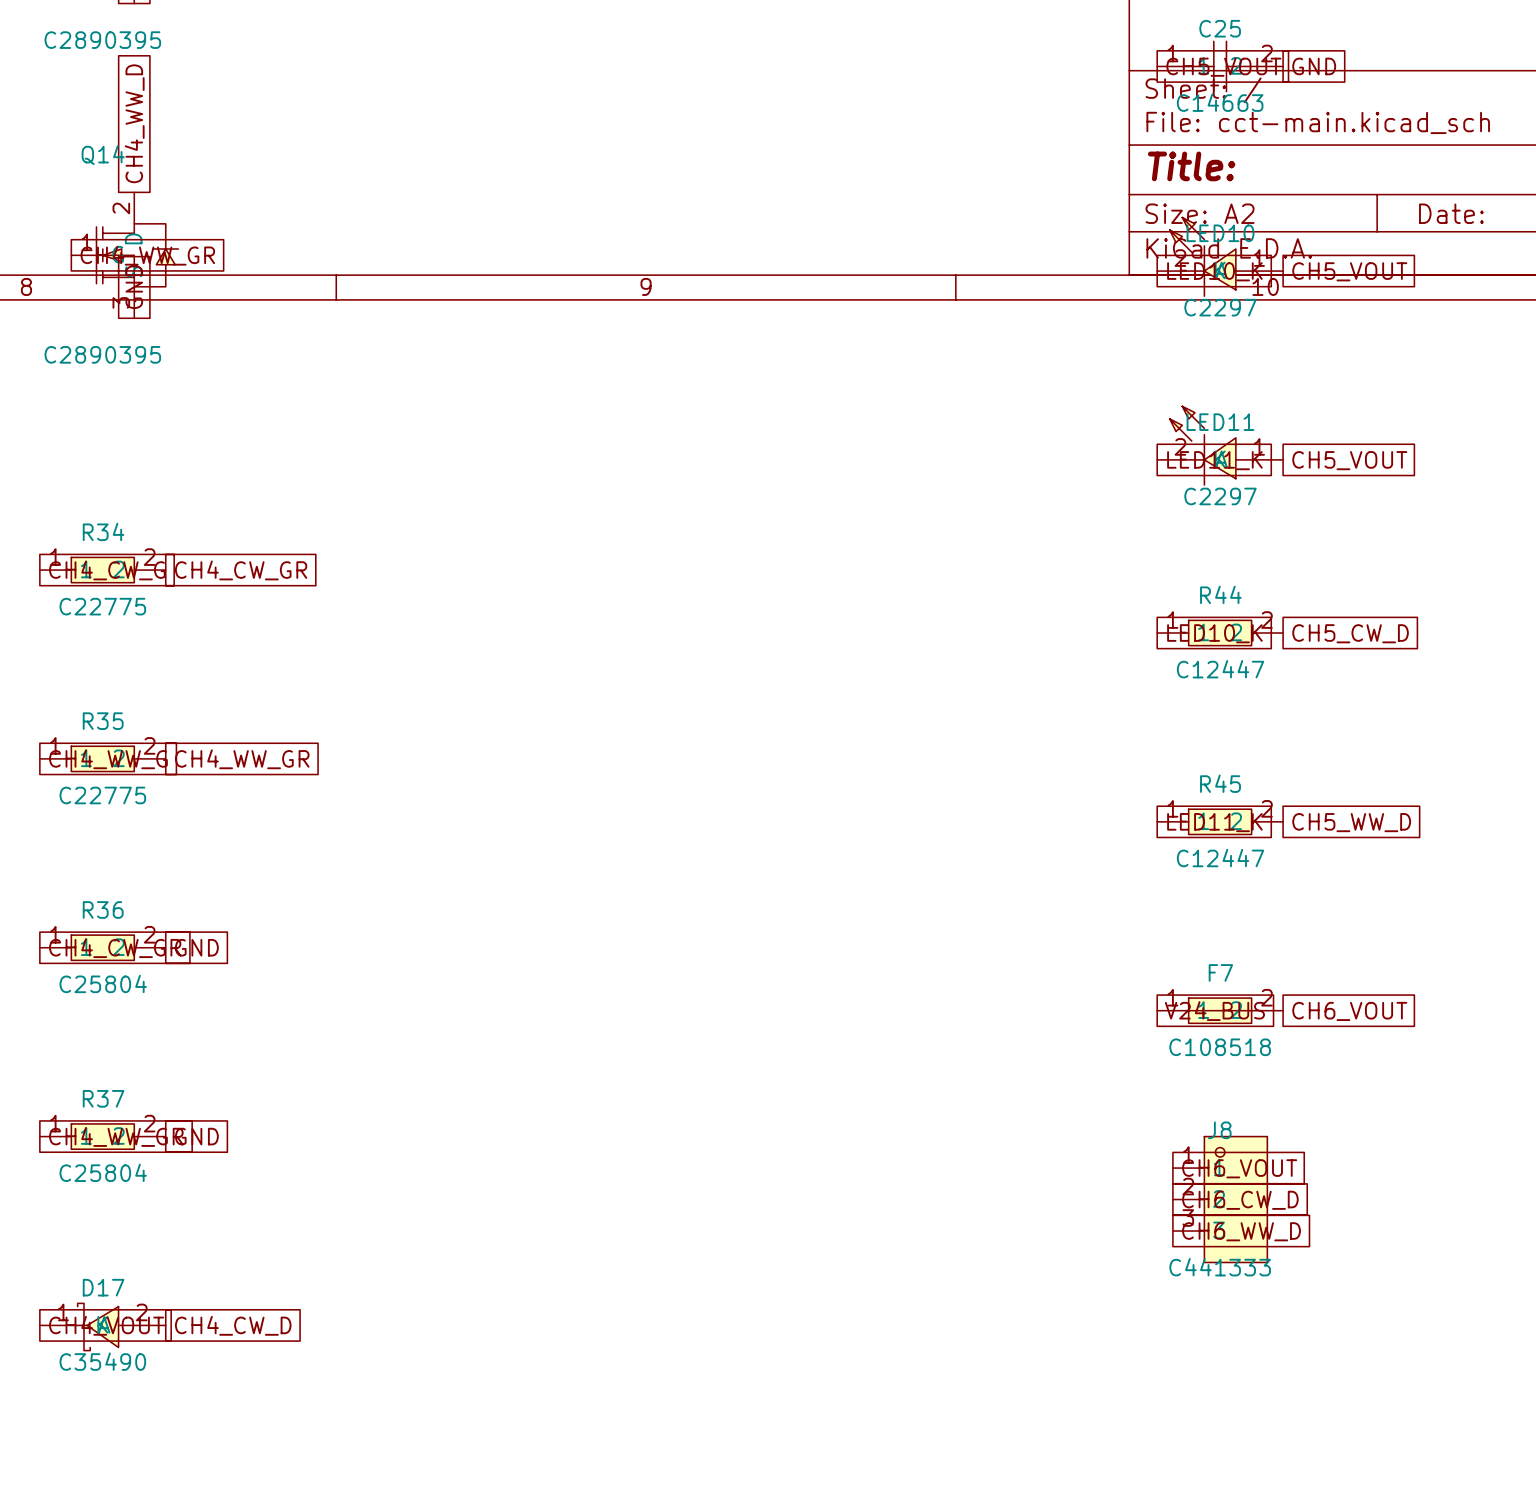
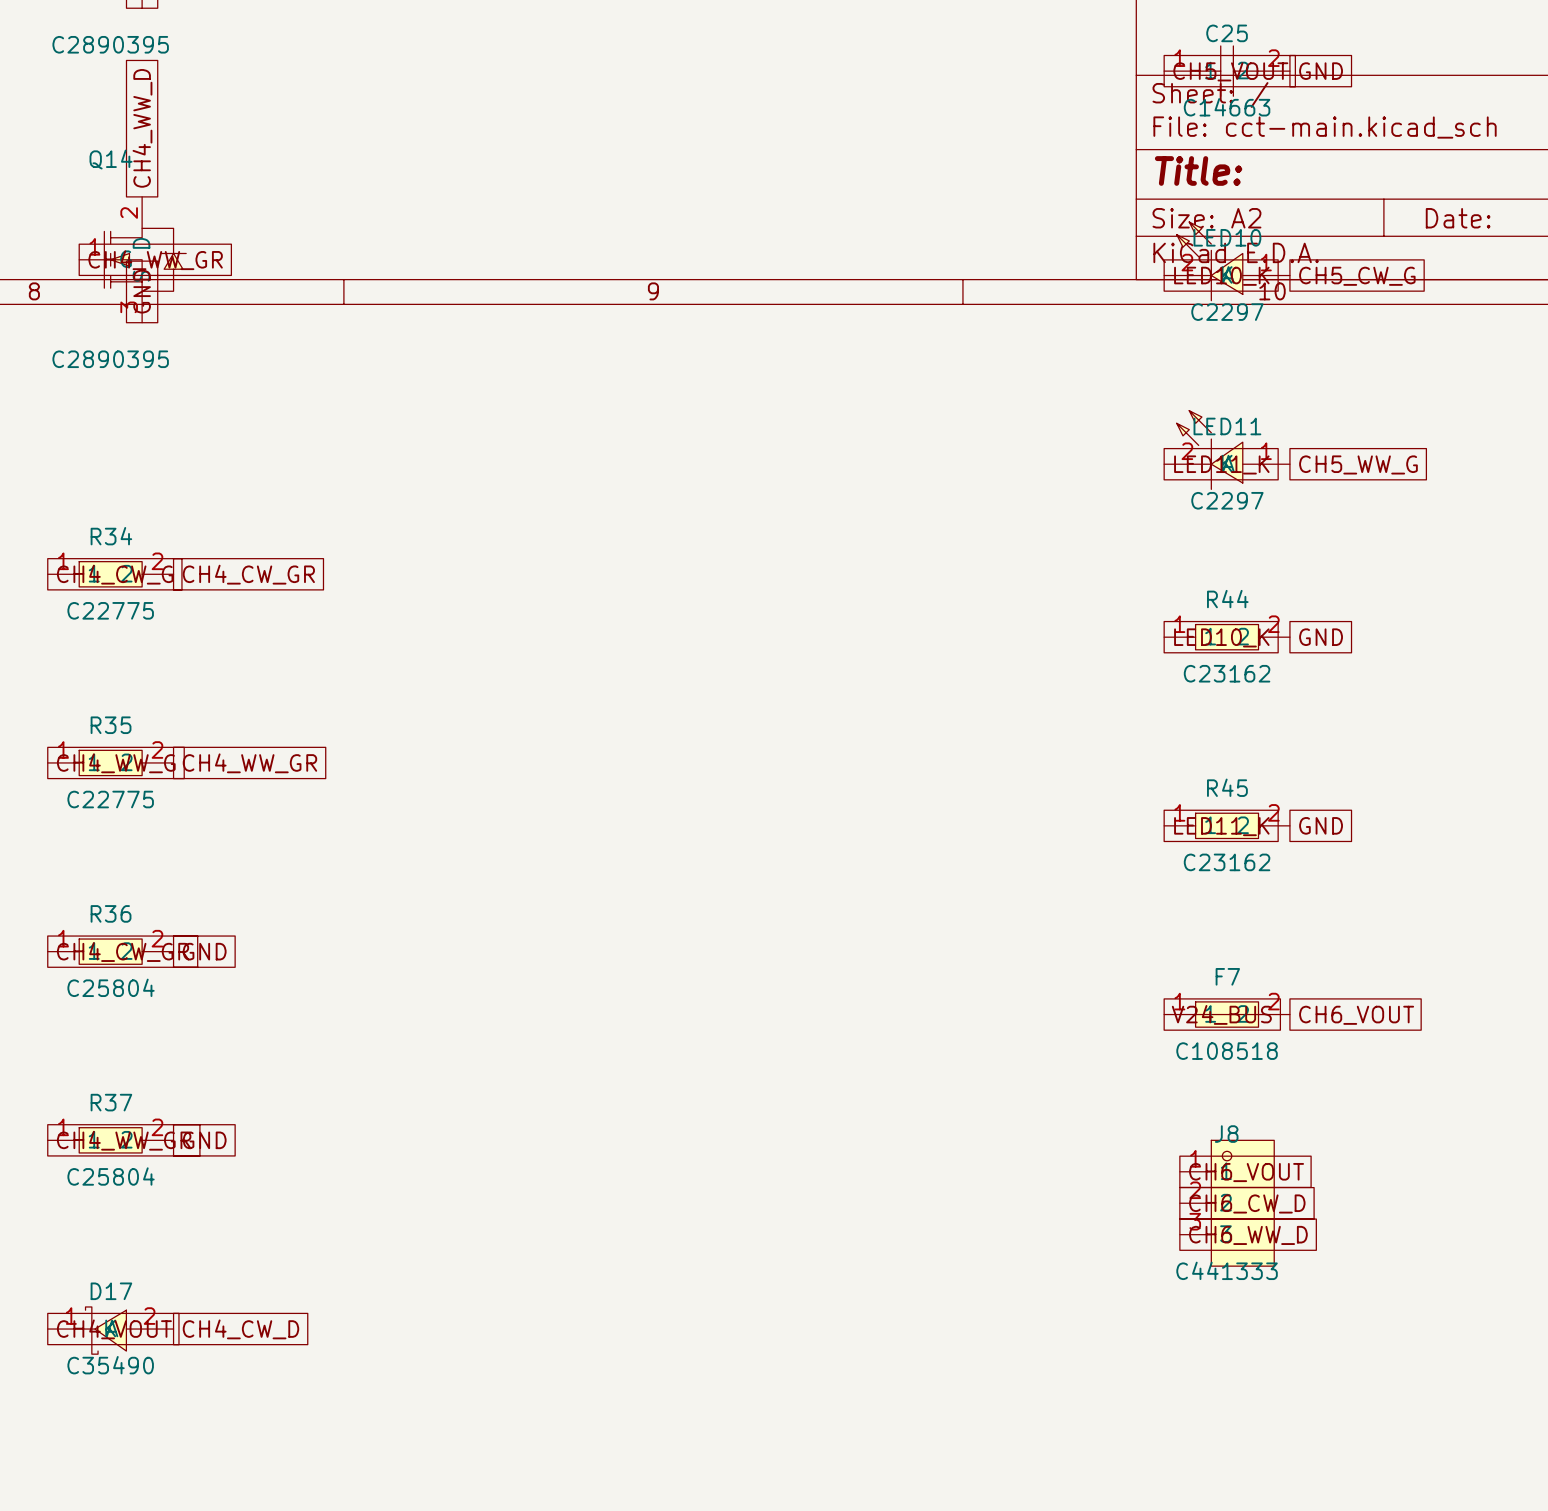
global label: CH5_VOUT (1349, 271) -> CH5_CW_G (1357, 276)
global label: CH5_VOUT (1349, 460) -> CH5_WW_G (1358, 464)
global label: CH5_CW_D (1350, 633) -> GND (1321, 637)
R44 value: C12447 (1220, 669) -> C23162 (1227, 673)
global label: CH5_WW_D (1351, 822) -> GND (1321, 825)
R45 value: C12447 (1220, 858) -> C23162 (1227, 862)

